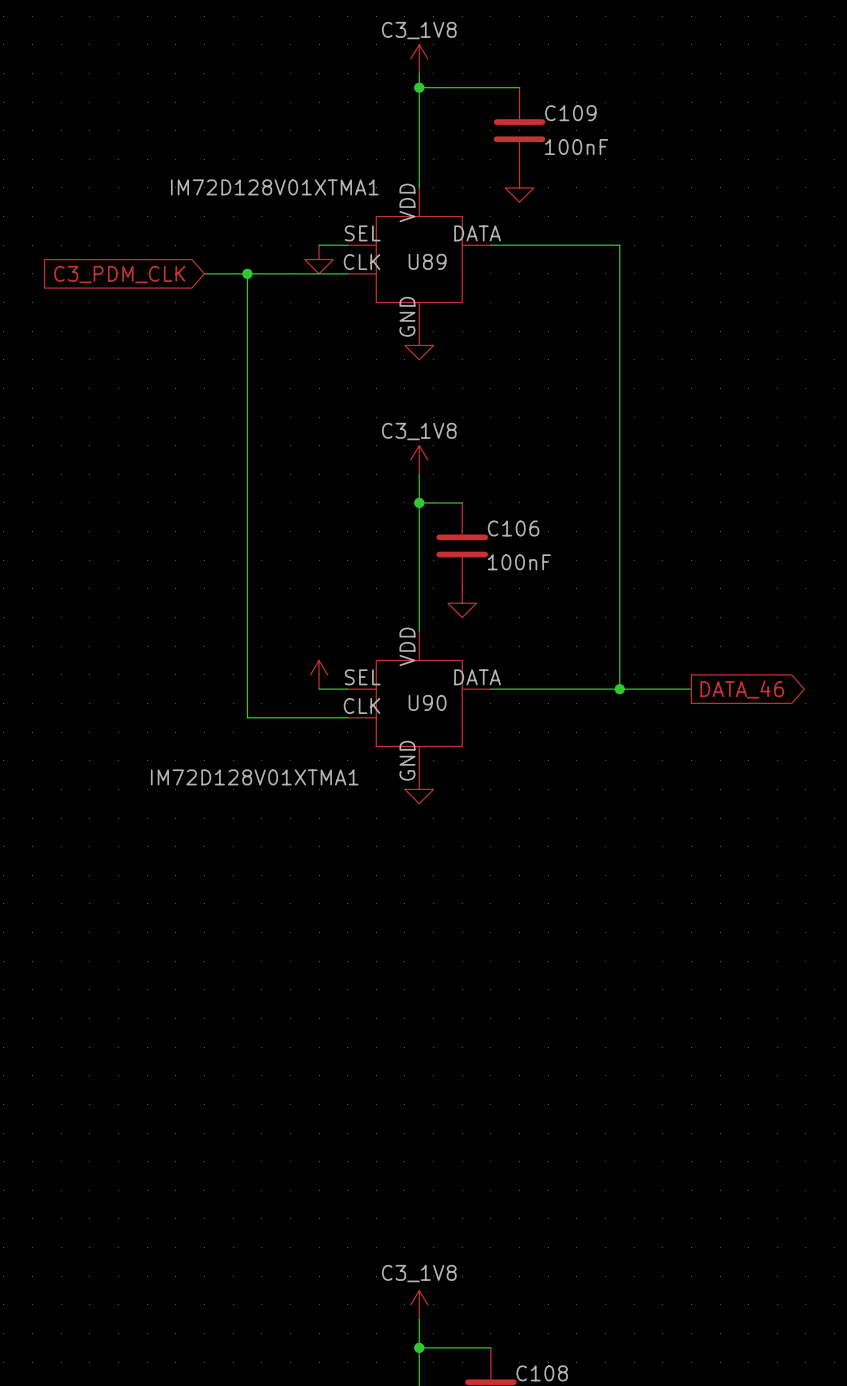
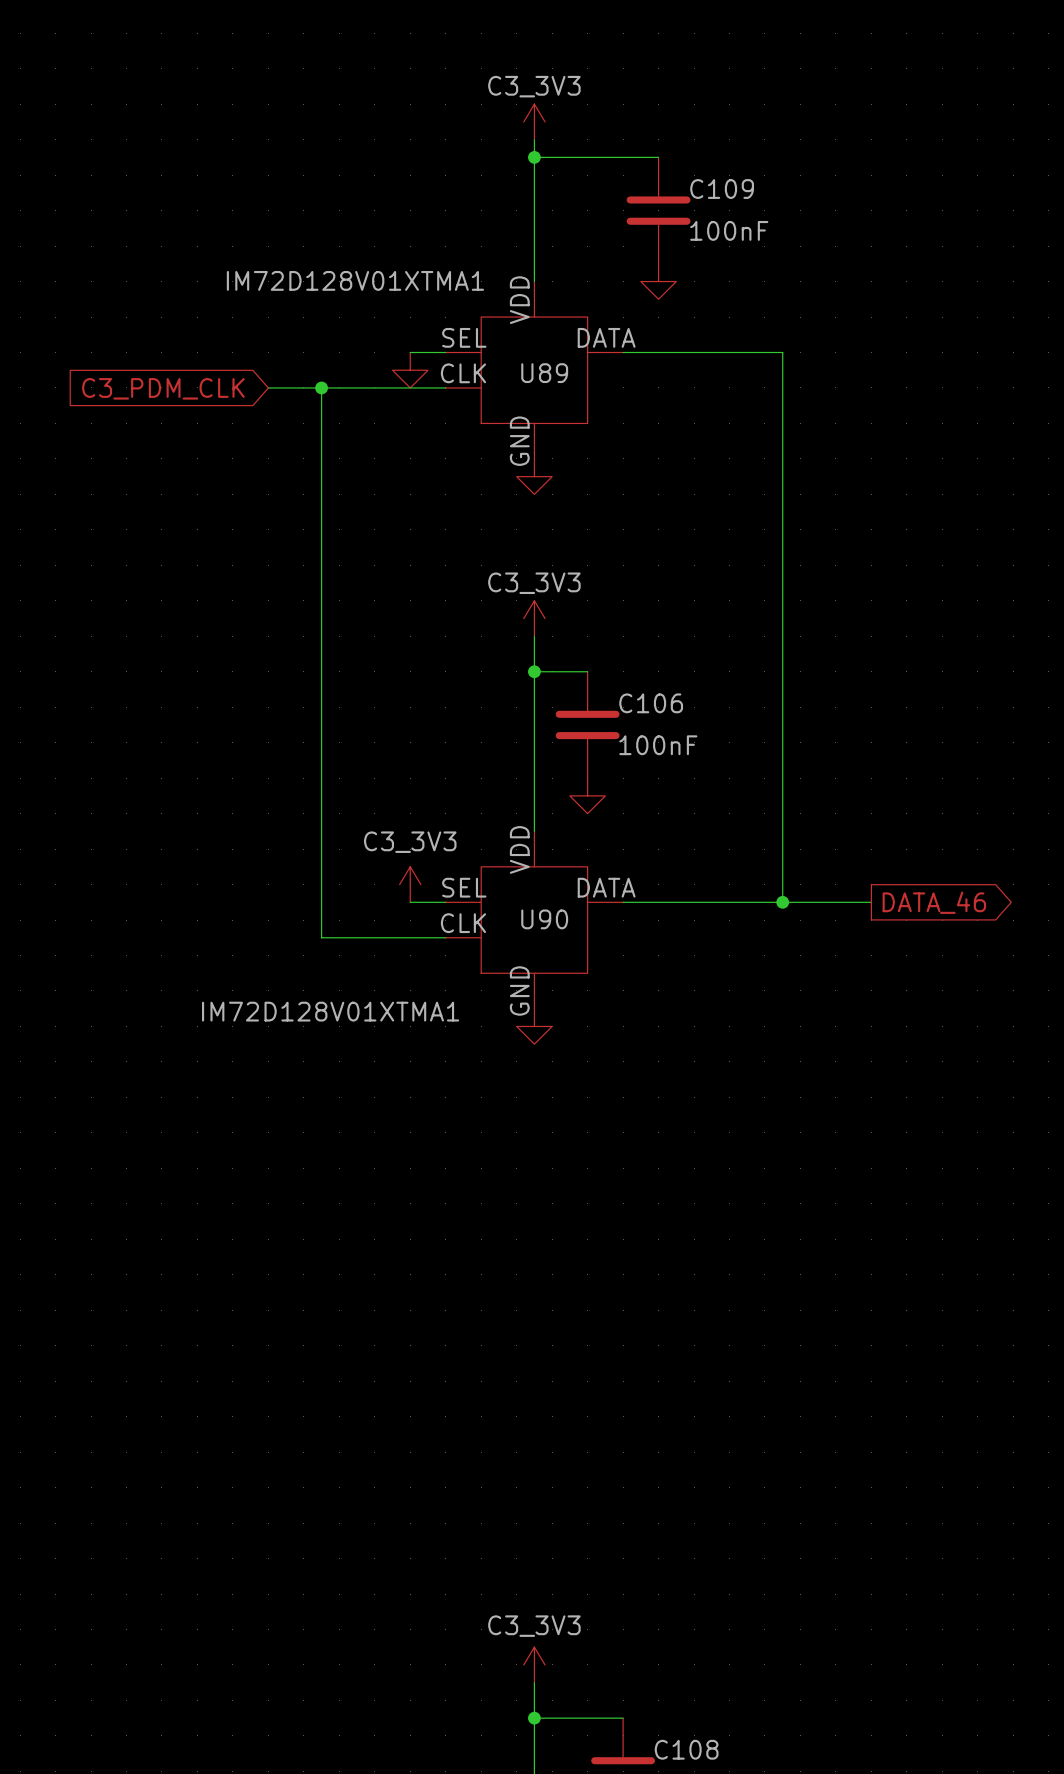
power symbol: C3_1V8 (419, 59) -> C3_3V3 (534, 121)
power symbol: C3_1V8 (419, 460) -> C3_3V3 (534, 618)
power symbol text: none -> C3_3V3 (410, 842)
power symbol: C3_1V8 (419, 1304) -> C3_3V3 (534, 1664)

